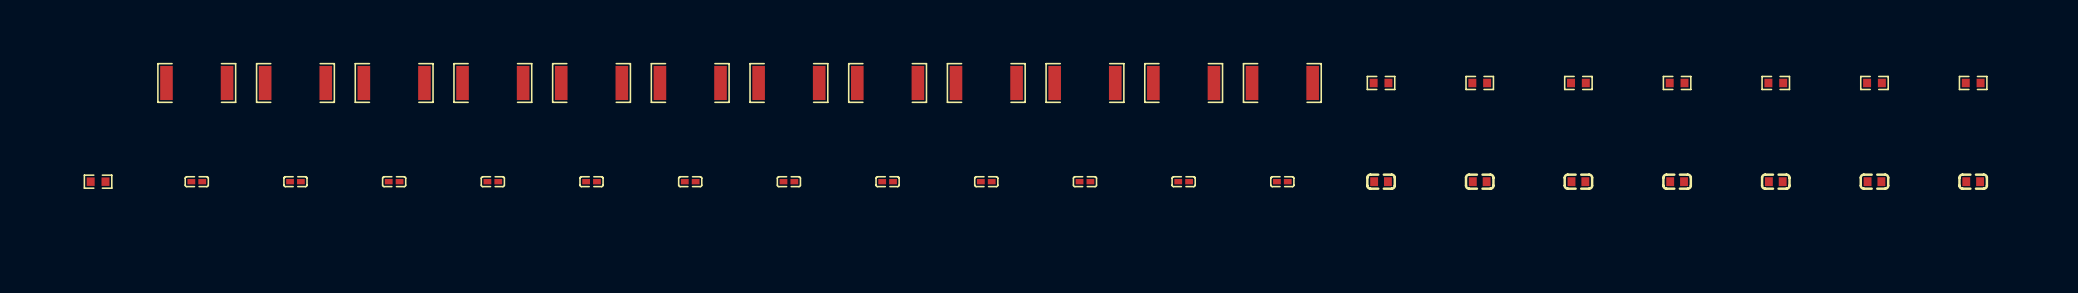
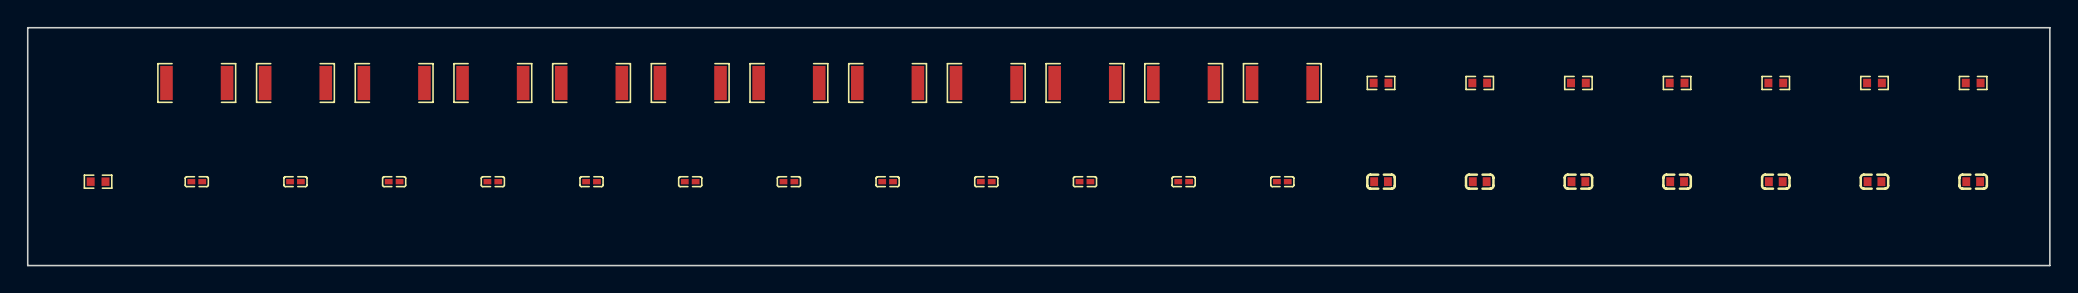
board edge: none -> (27, 27) (2049, 27) (2049, 265) (27, 265) (27, 27)

